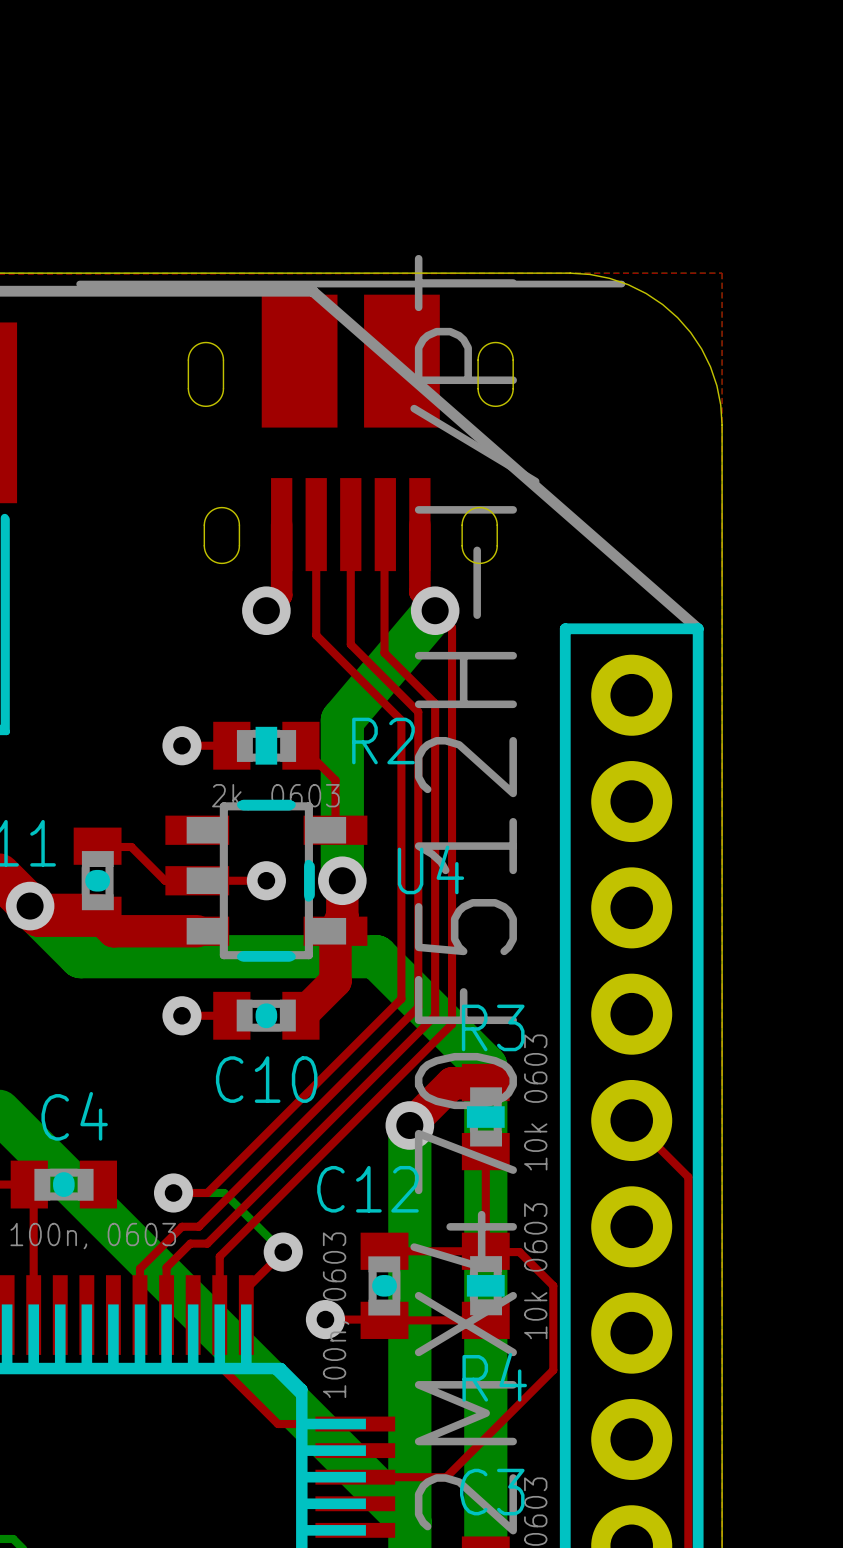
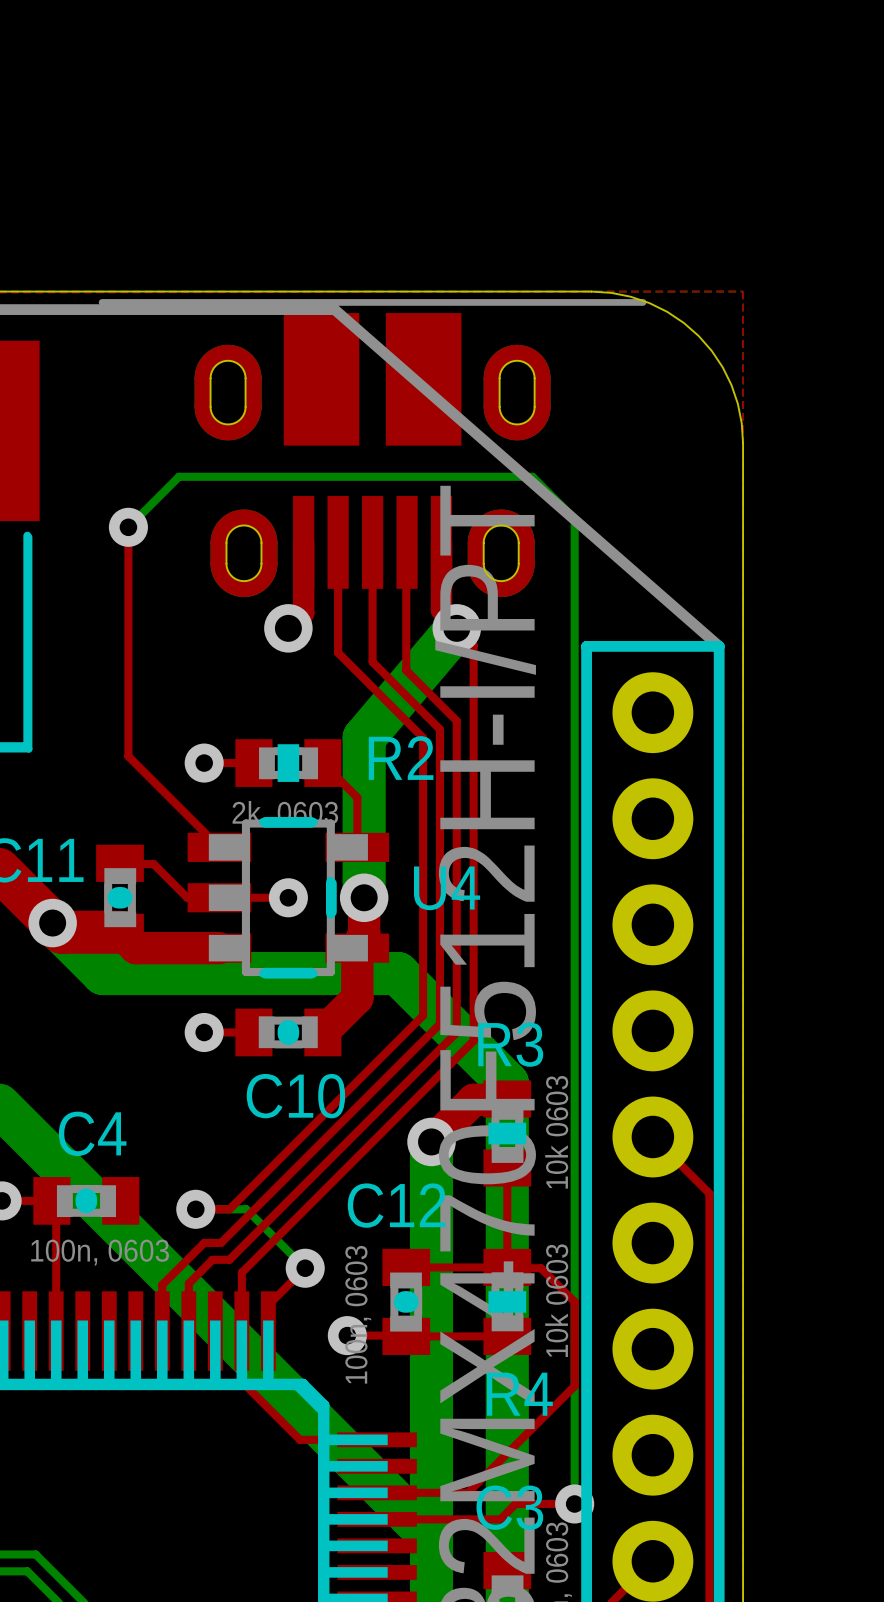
part footprint: [76, 280, 626, 572] -> [98, 299, 647, 598]
top track: none -> (128, 527) (128, 756) (219, 847)
bottom track: none -> (128, 527) (178, 476) (532, 476) (574, 518) (574, 1503)
via: none -> (128, 527)
top track: none -> (574, 1503) (515, 1503) (500, 1519) (377, 1519)
via: none -> (574, 1503)

